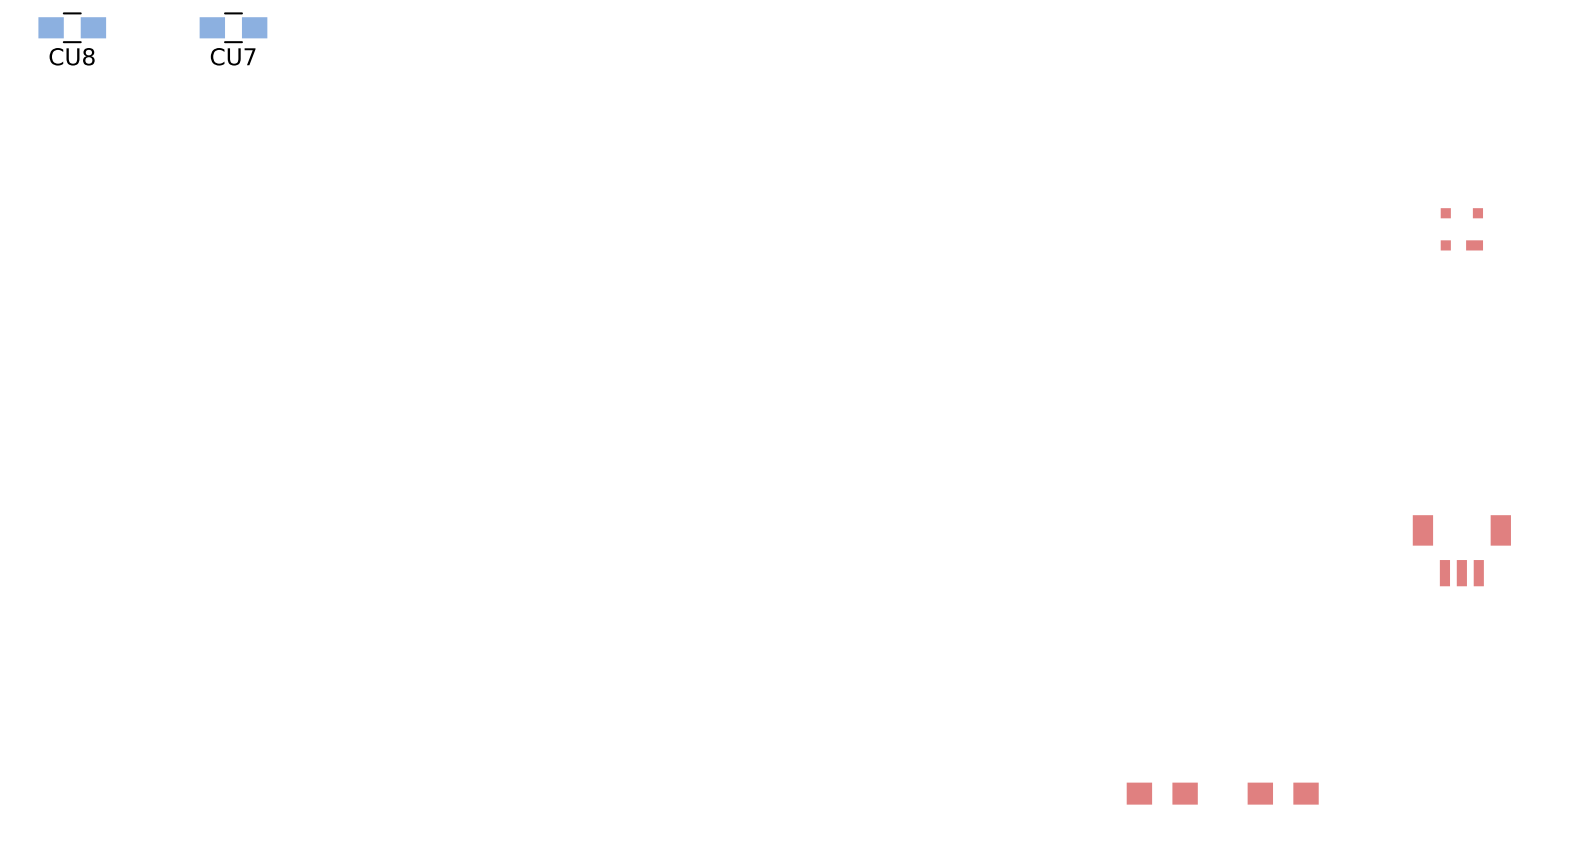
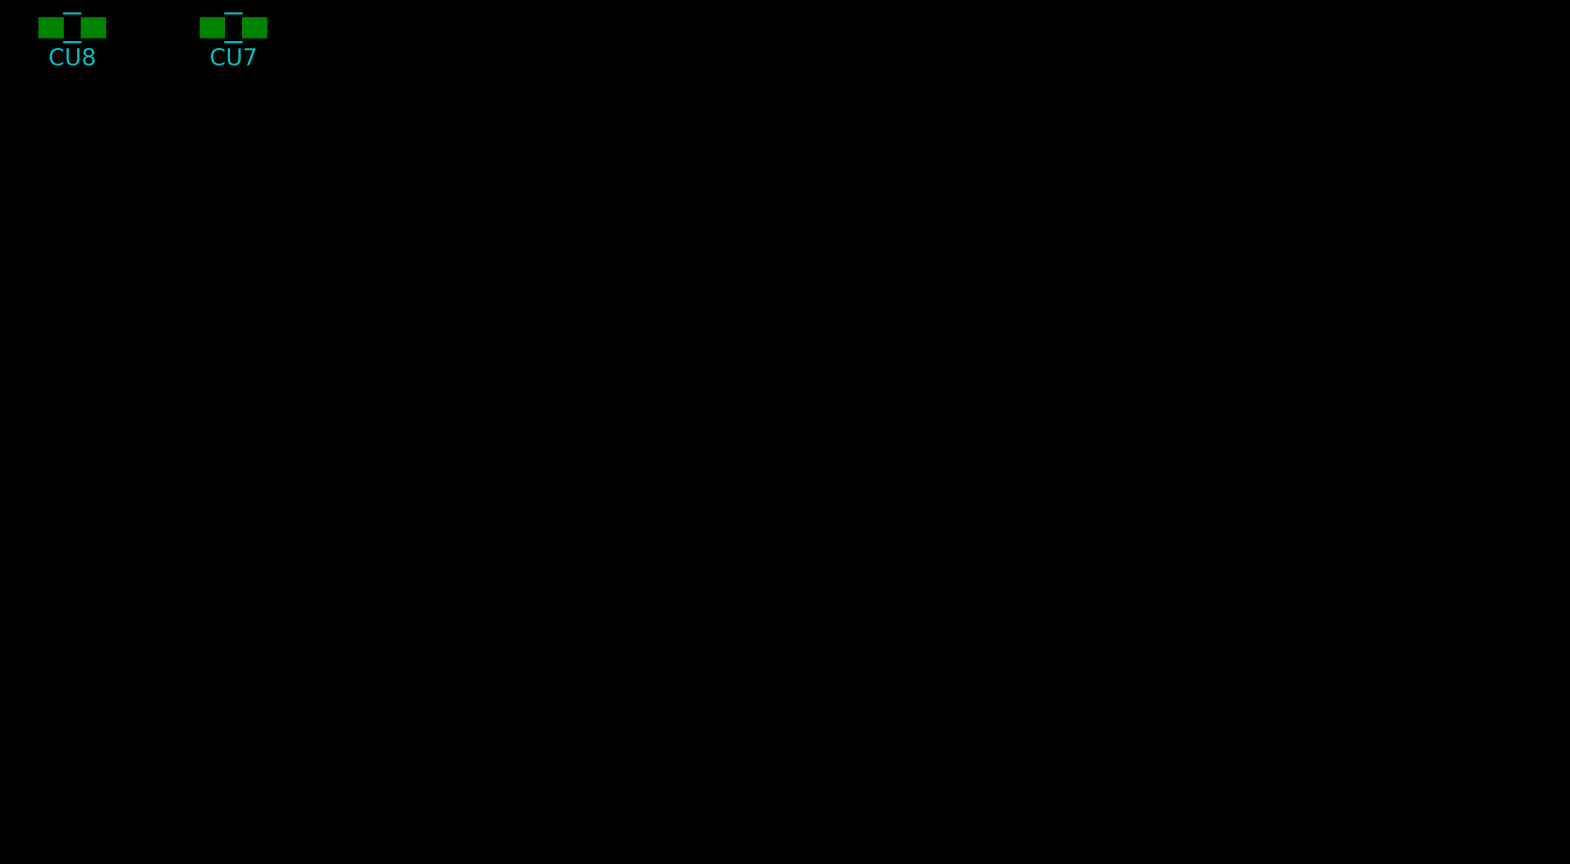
part: (1461, 229) -> none
part: (1461, 550) -> none
part: (1162, 793) -> none
part: (1283, 793) -> none

